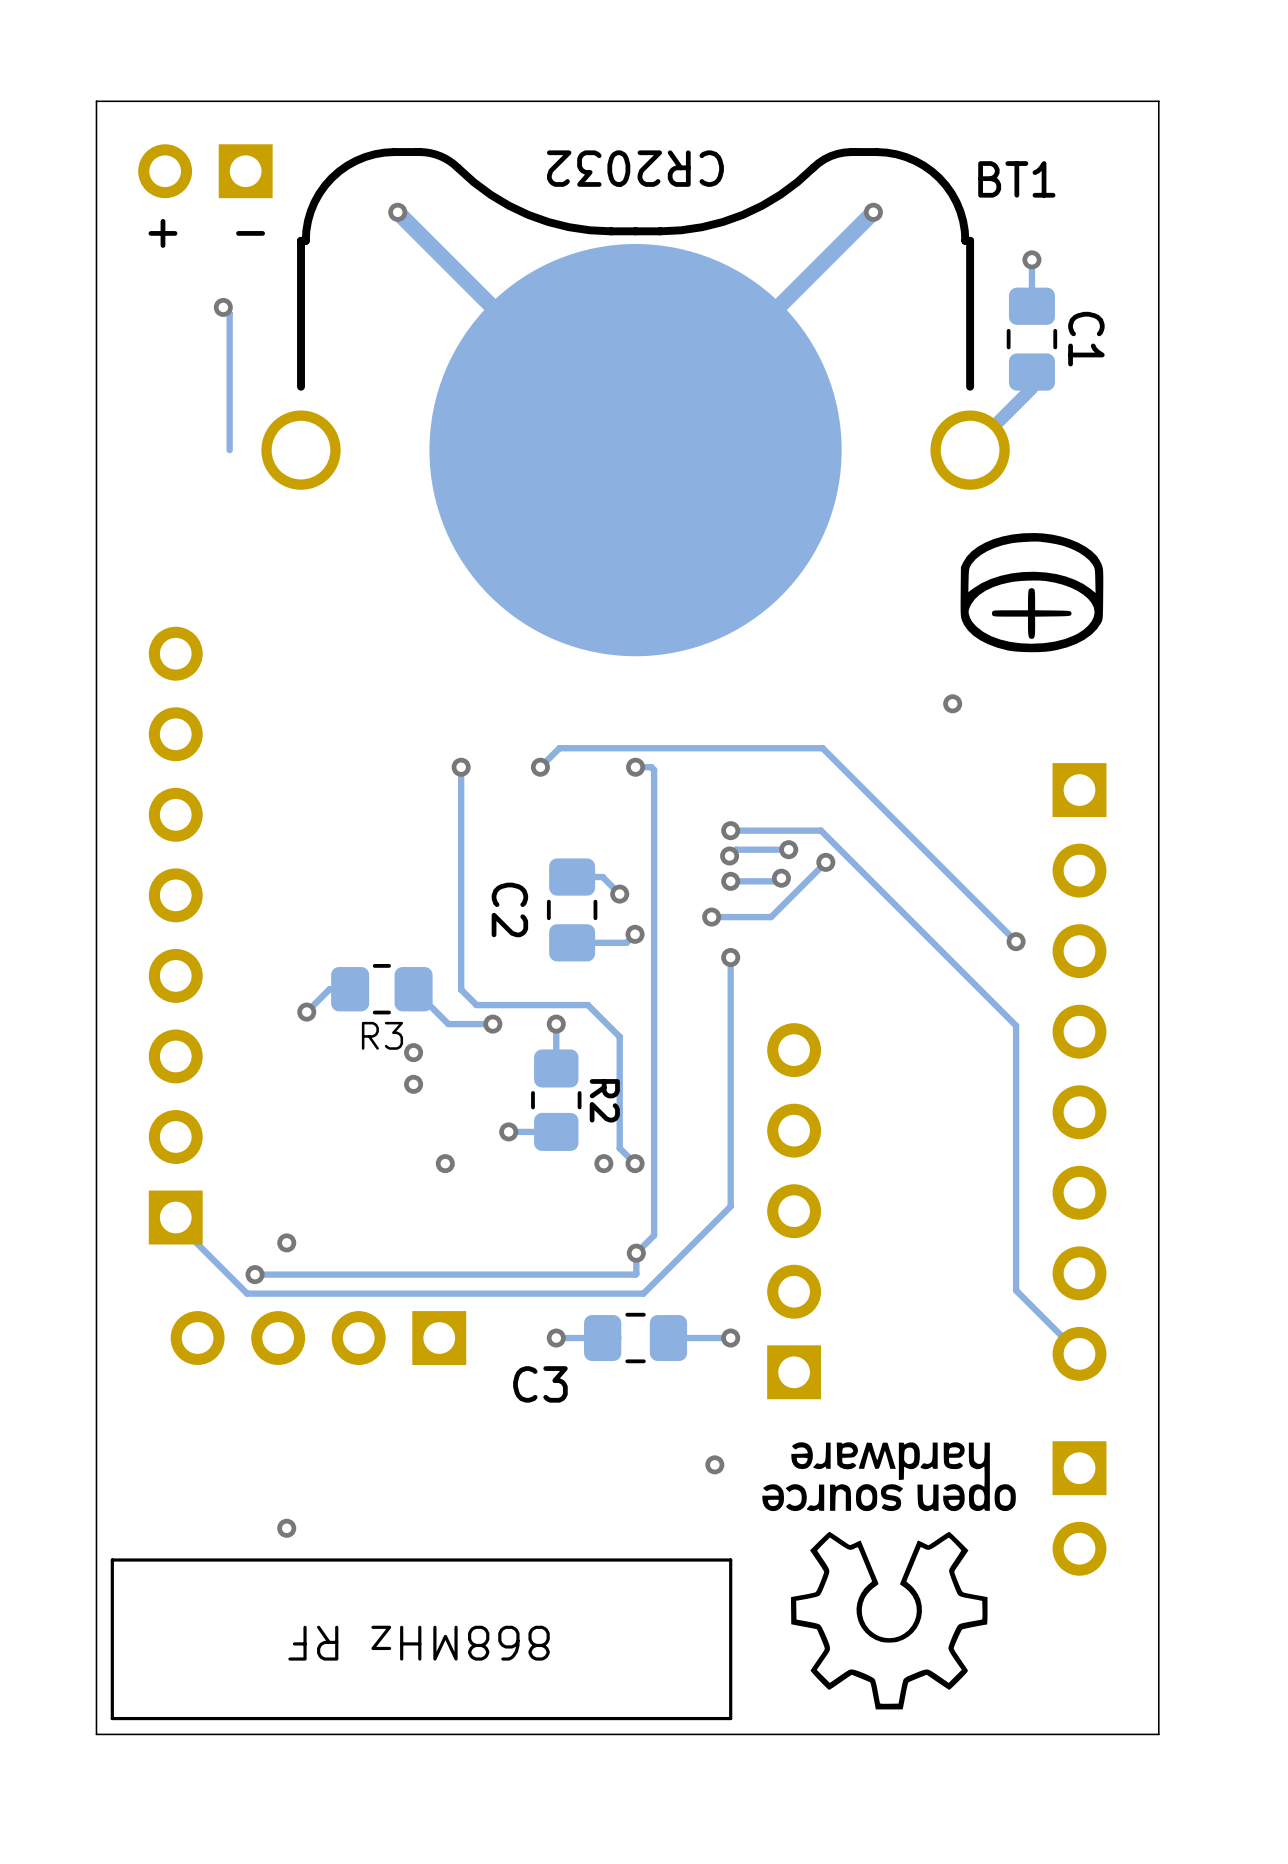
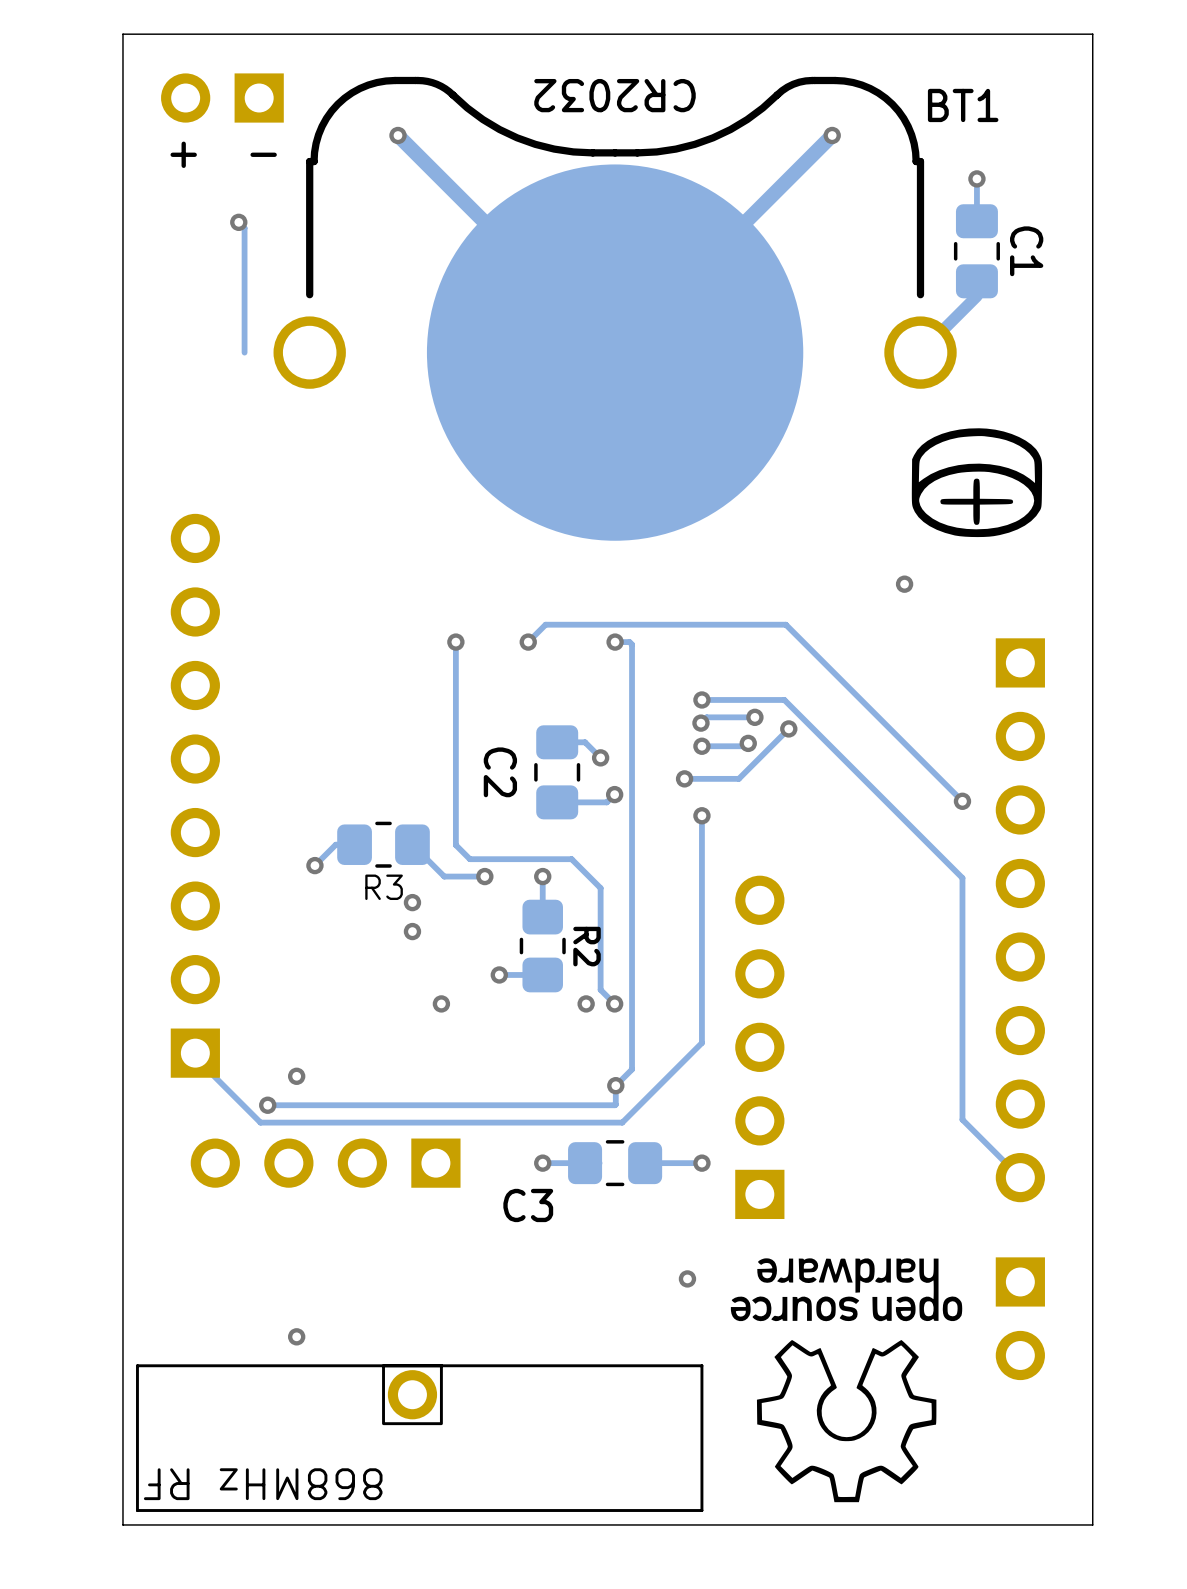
part: none -> (412, 1394)
text position: 868MHz RF (419, 1643) -> 868MHz RF (263, 1484)

